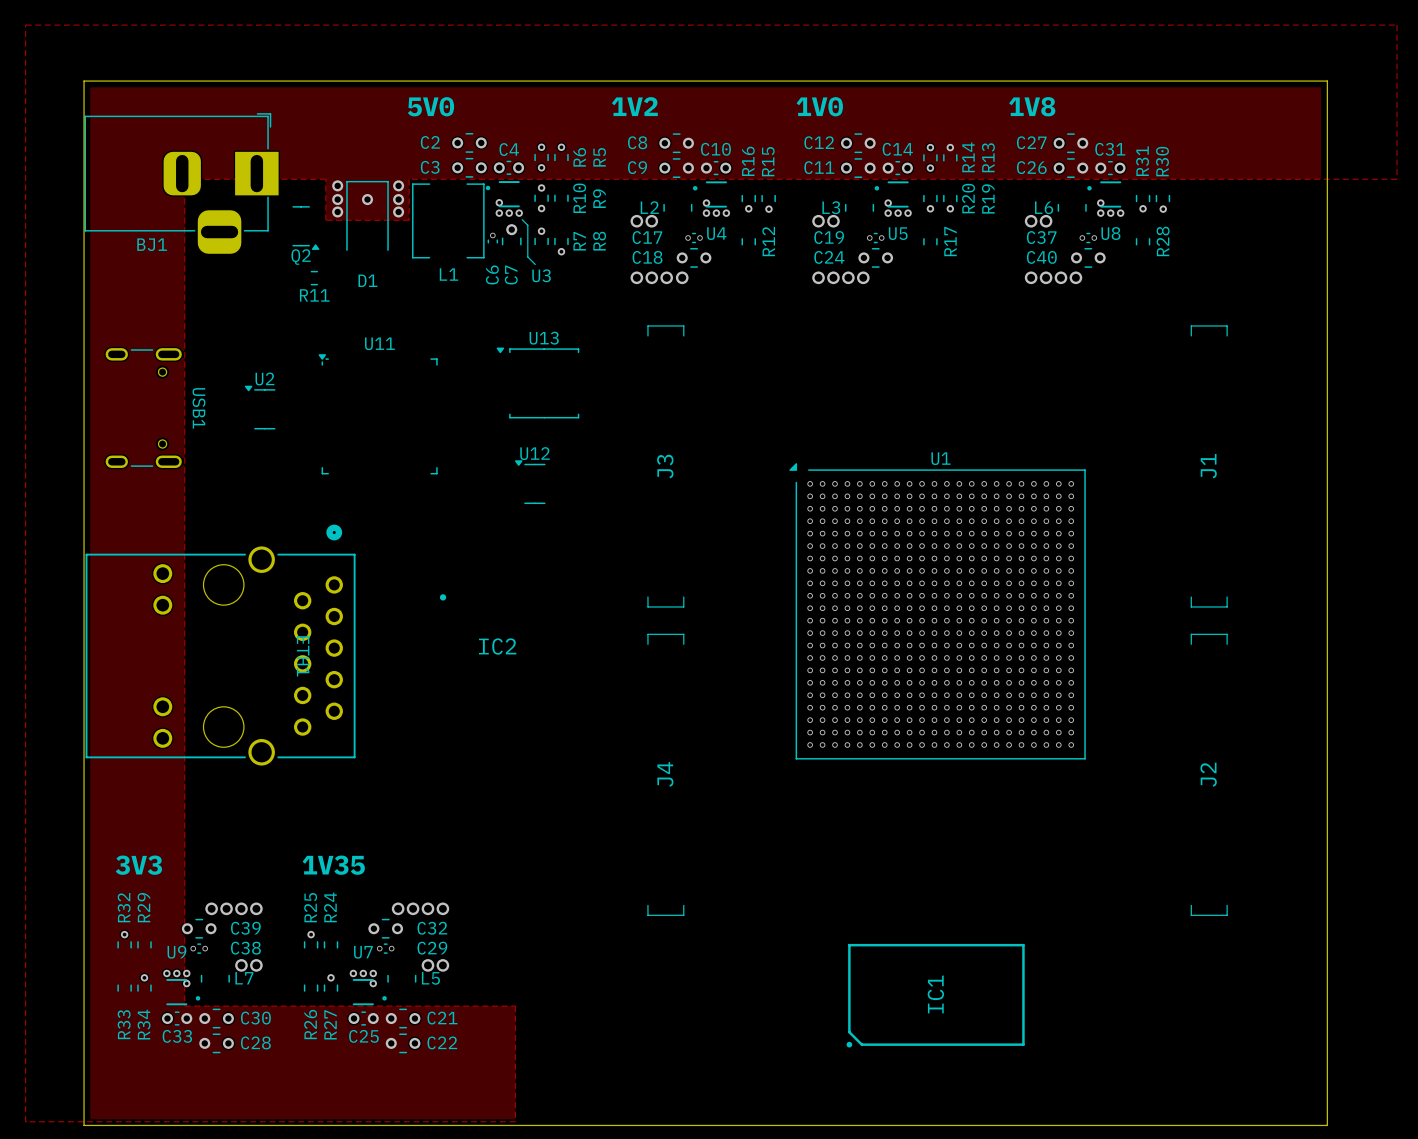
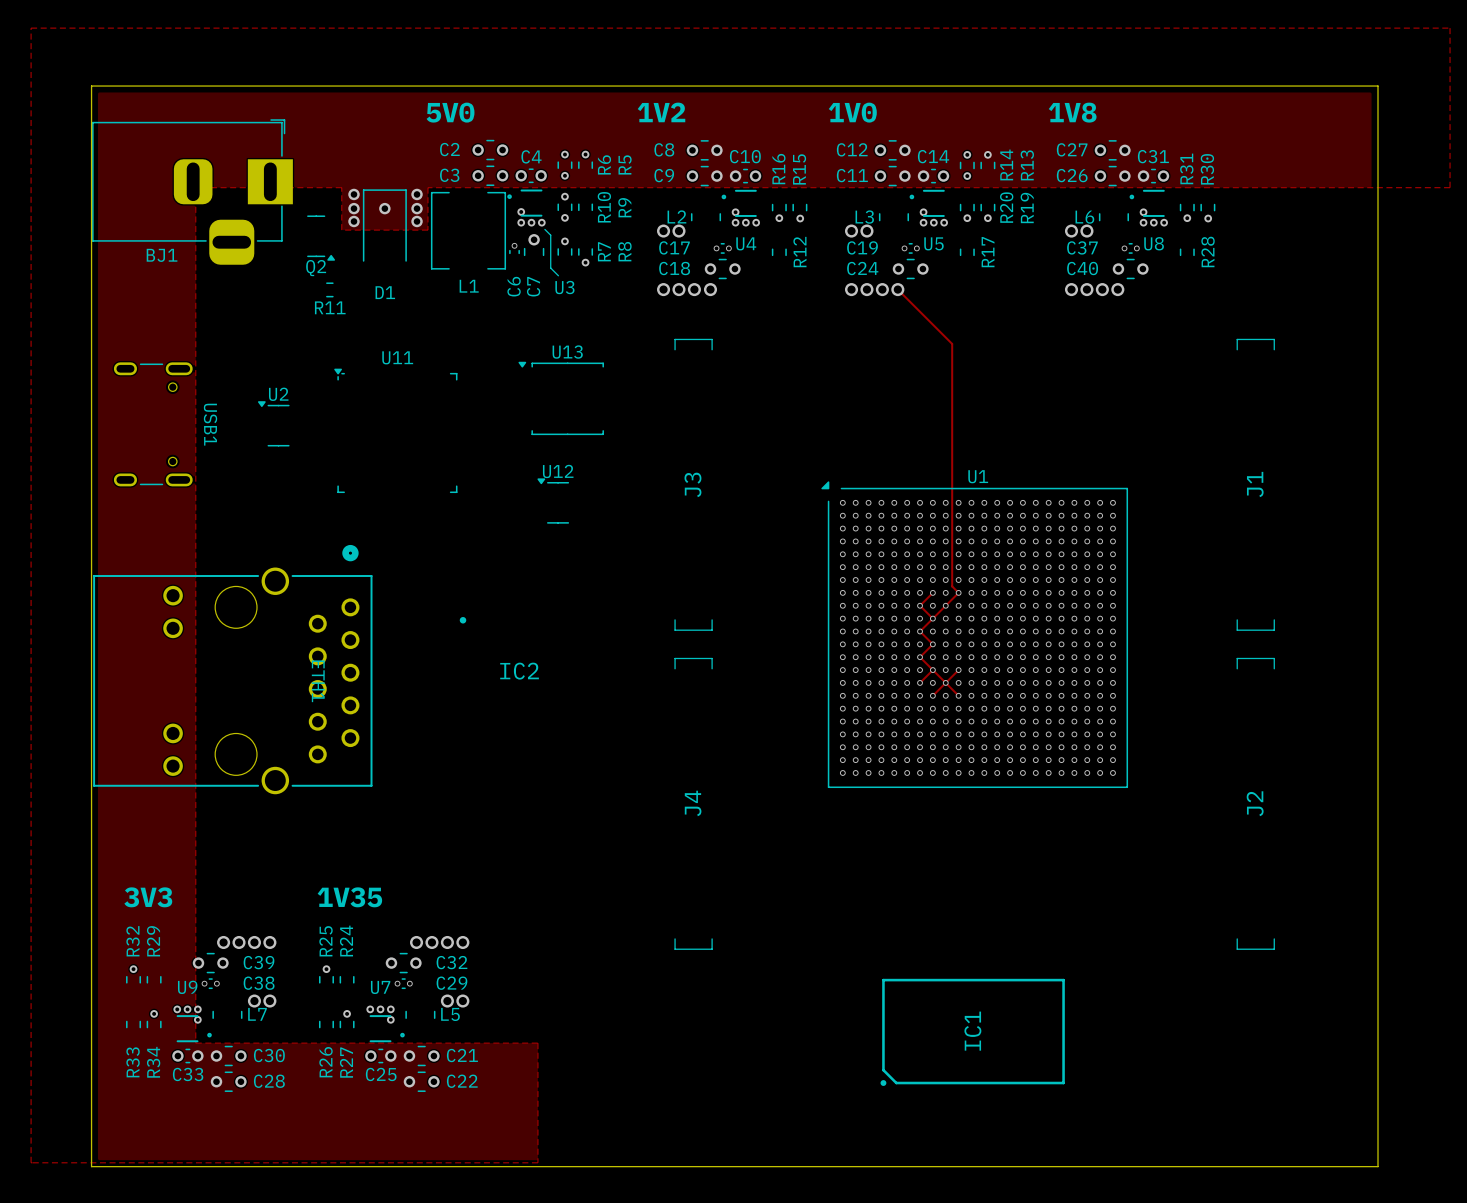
track: none -> (897, 289) (952, 343) (952, 586) (958, 592) (920, 631) (932, 644) (920, 657) (958, 695)
track: none -> (932, 592) (920, 605) (932, 618)
track: none -> (932, 670) (920, 682)
track: none -> (958, 670) (932, 695)

